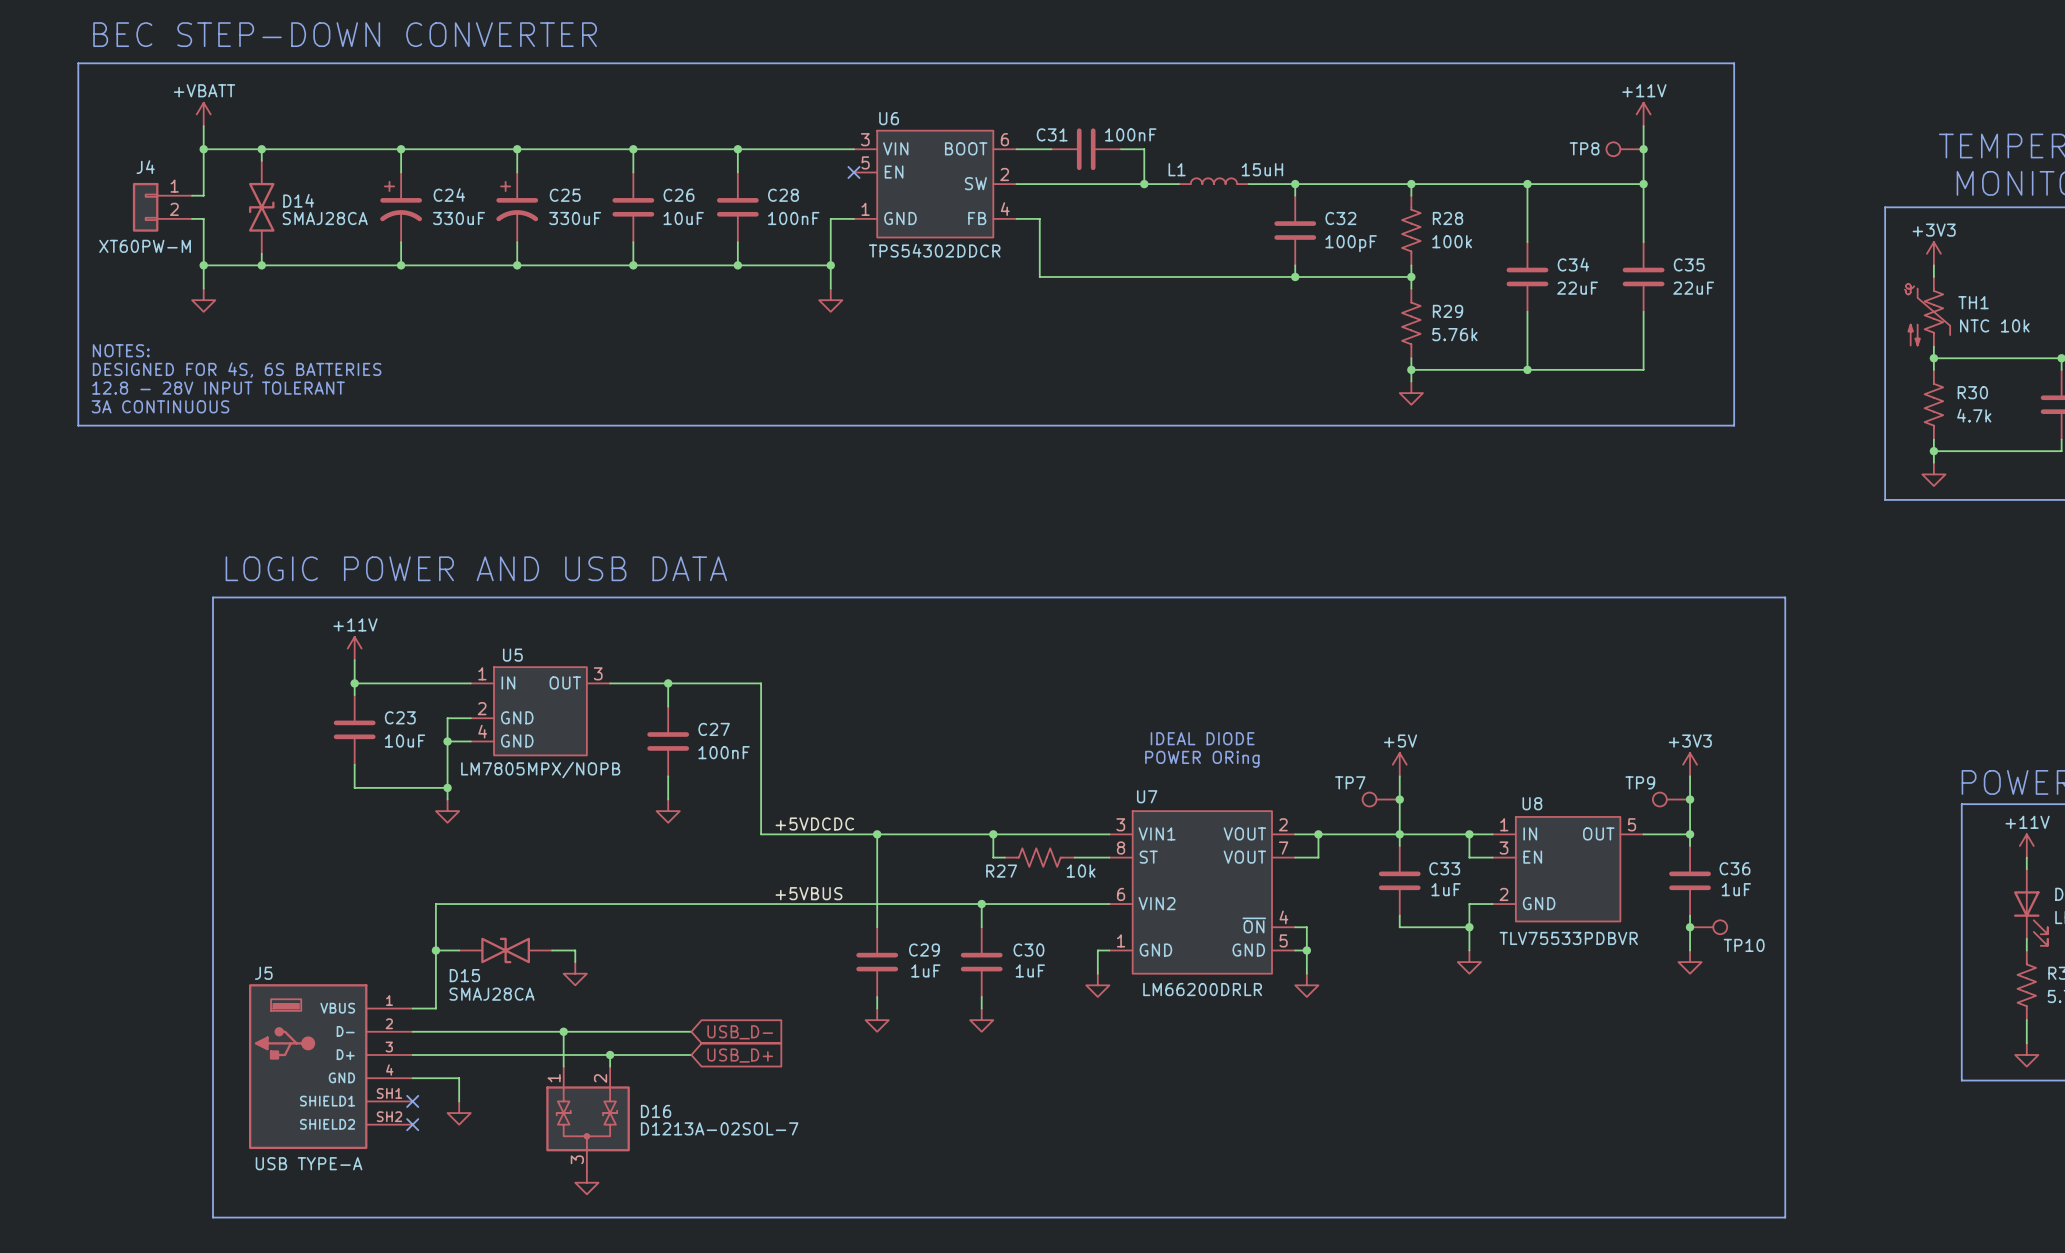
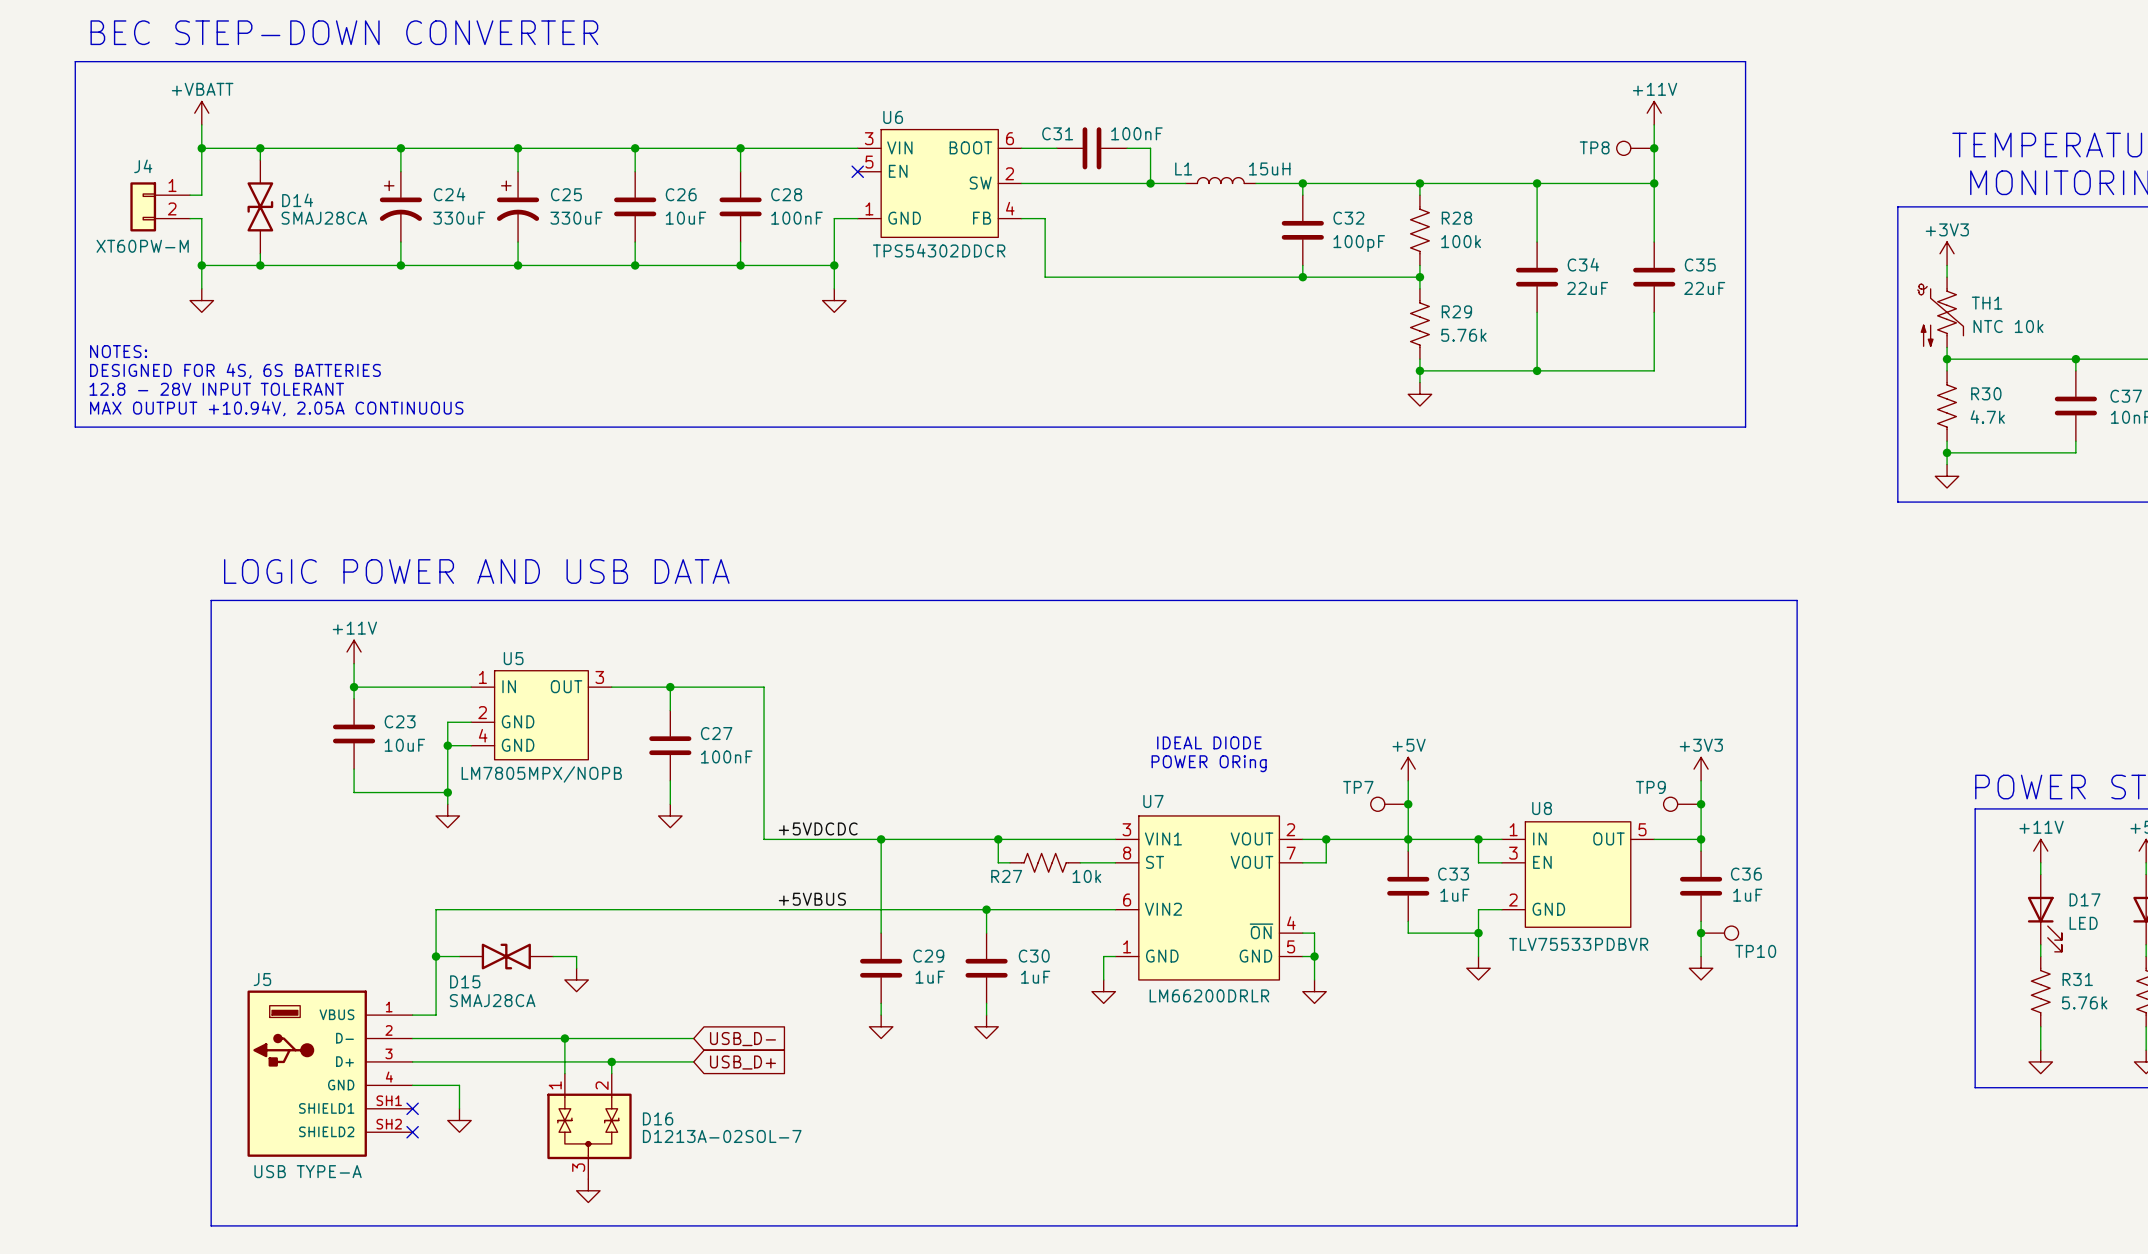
text: 3A CONTINUOUS (160, 406) -> MAX OUTPUT +10.94V, 2.05A CONTINUOUS (276, 408)

